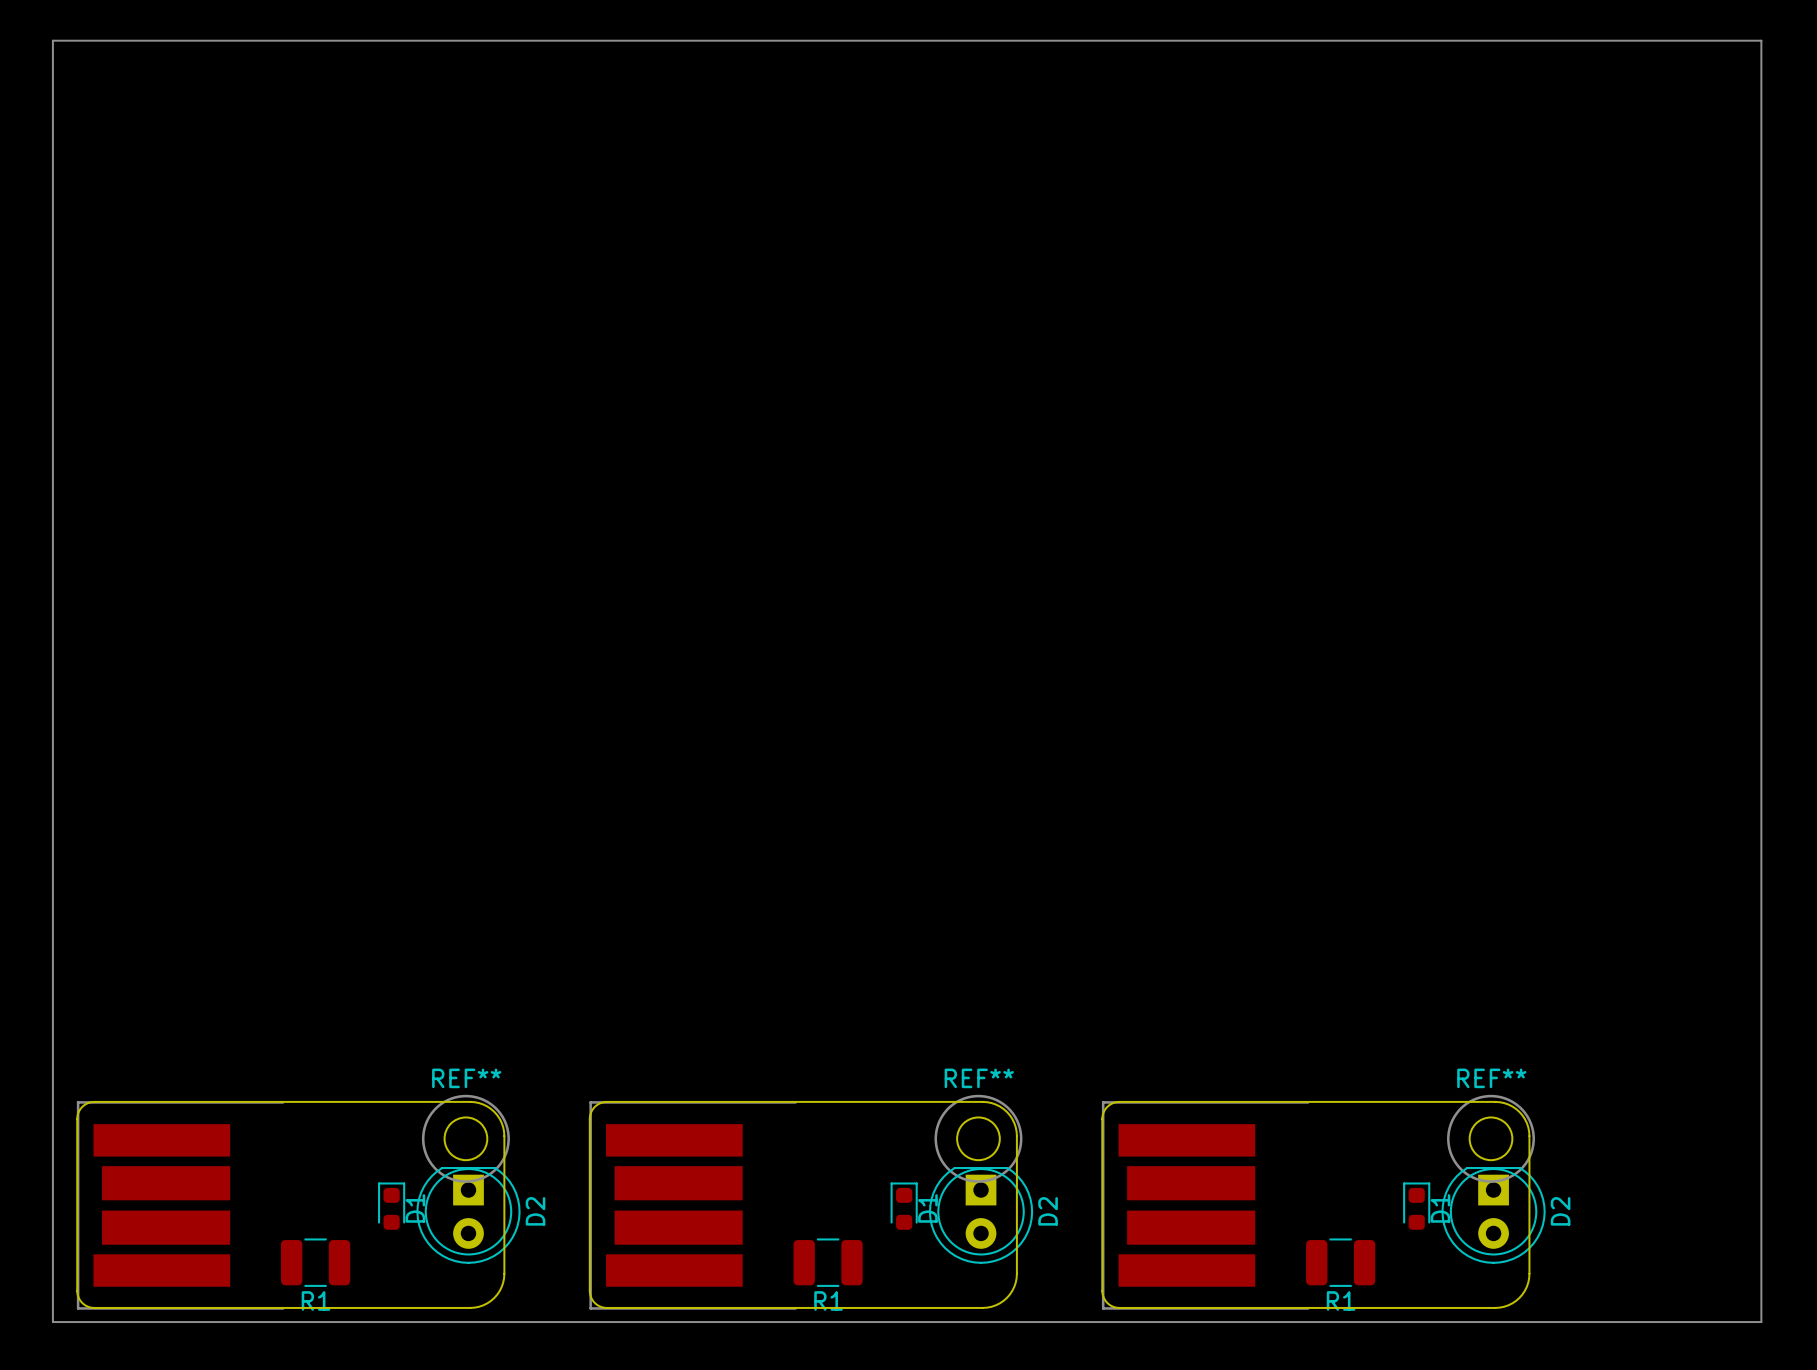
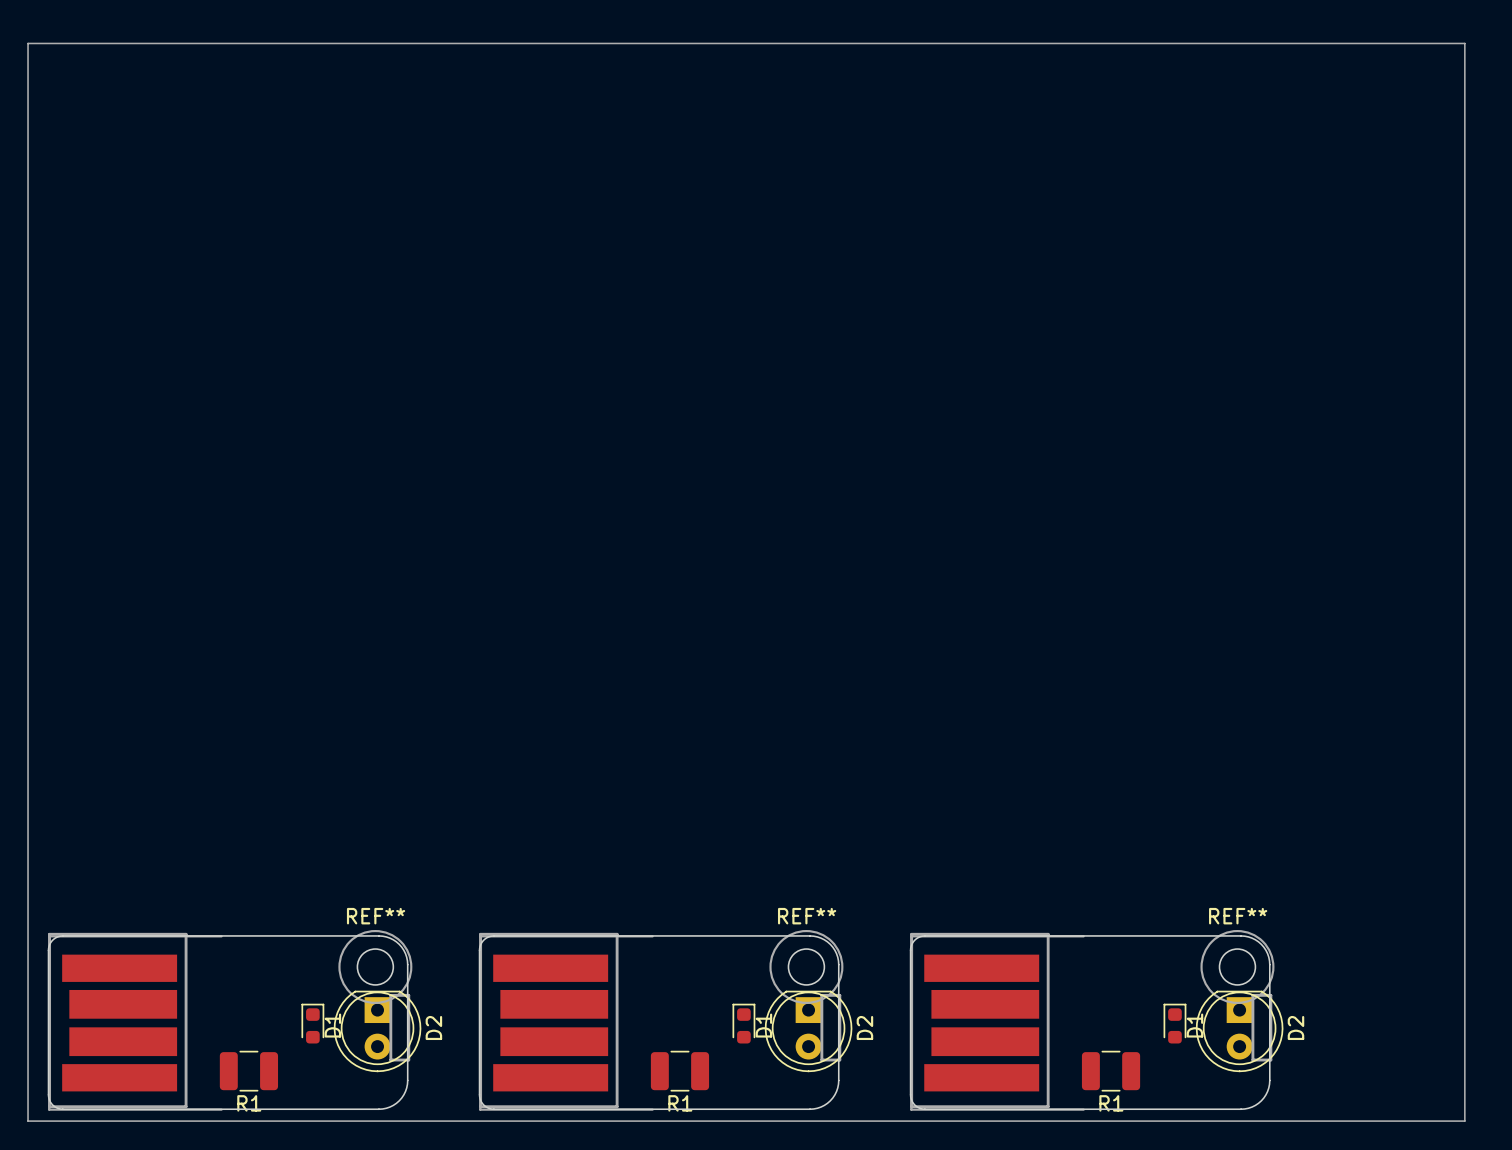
line: none -> (49, 934) (186, 934) (186, 1106) (49, 1106) (49, 934)
line: none -> (480, 934) (480, 1106) (617, 1106) (617, 934) (480, 934)
line: none -> (911, 934) (911, 1106) (1048, 1106) (1048, 934) (911, 934)
line: none -> (390, 995) (408, 995) (408, 1060) (390, 1060) (390, 995)
line: none -> (821, 995) (821, 1060) (839, 1060) (839, 995) (821, 995)
line: none -> (1252, 995) (1252, 1060) (1270, 1060) (1270, 995) (1252, 995)

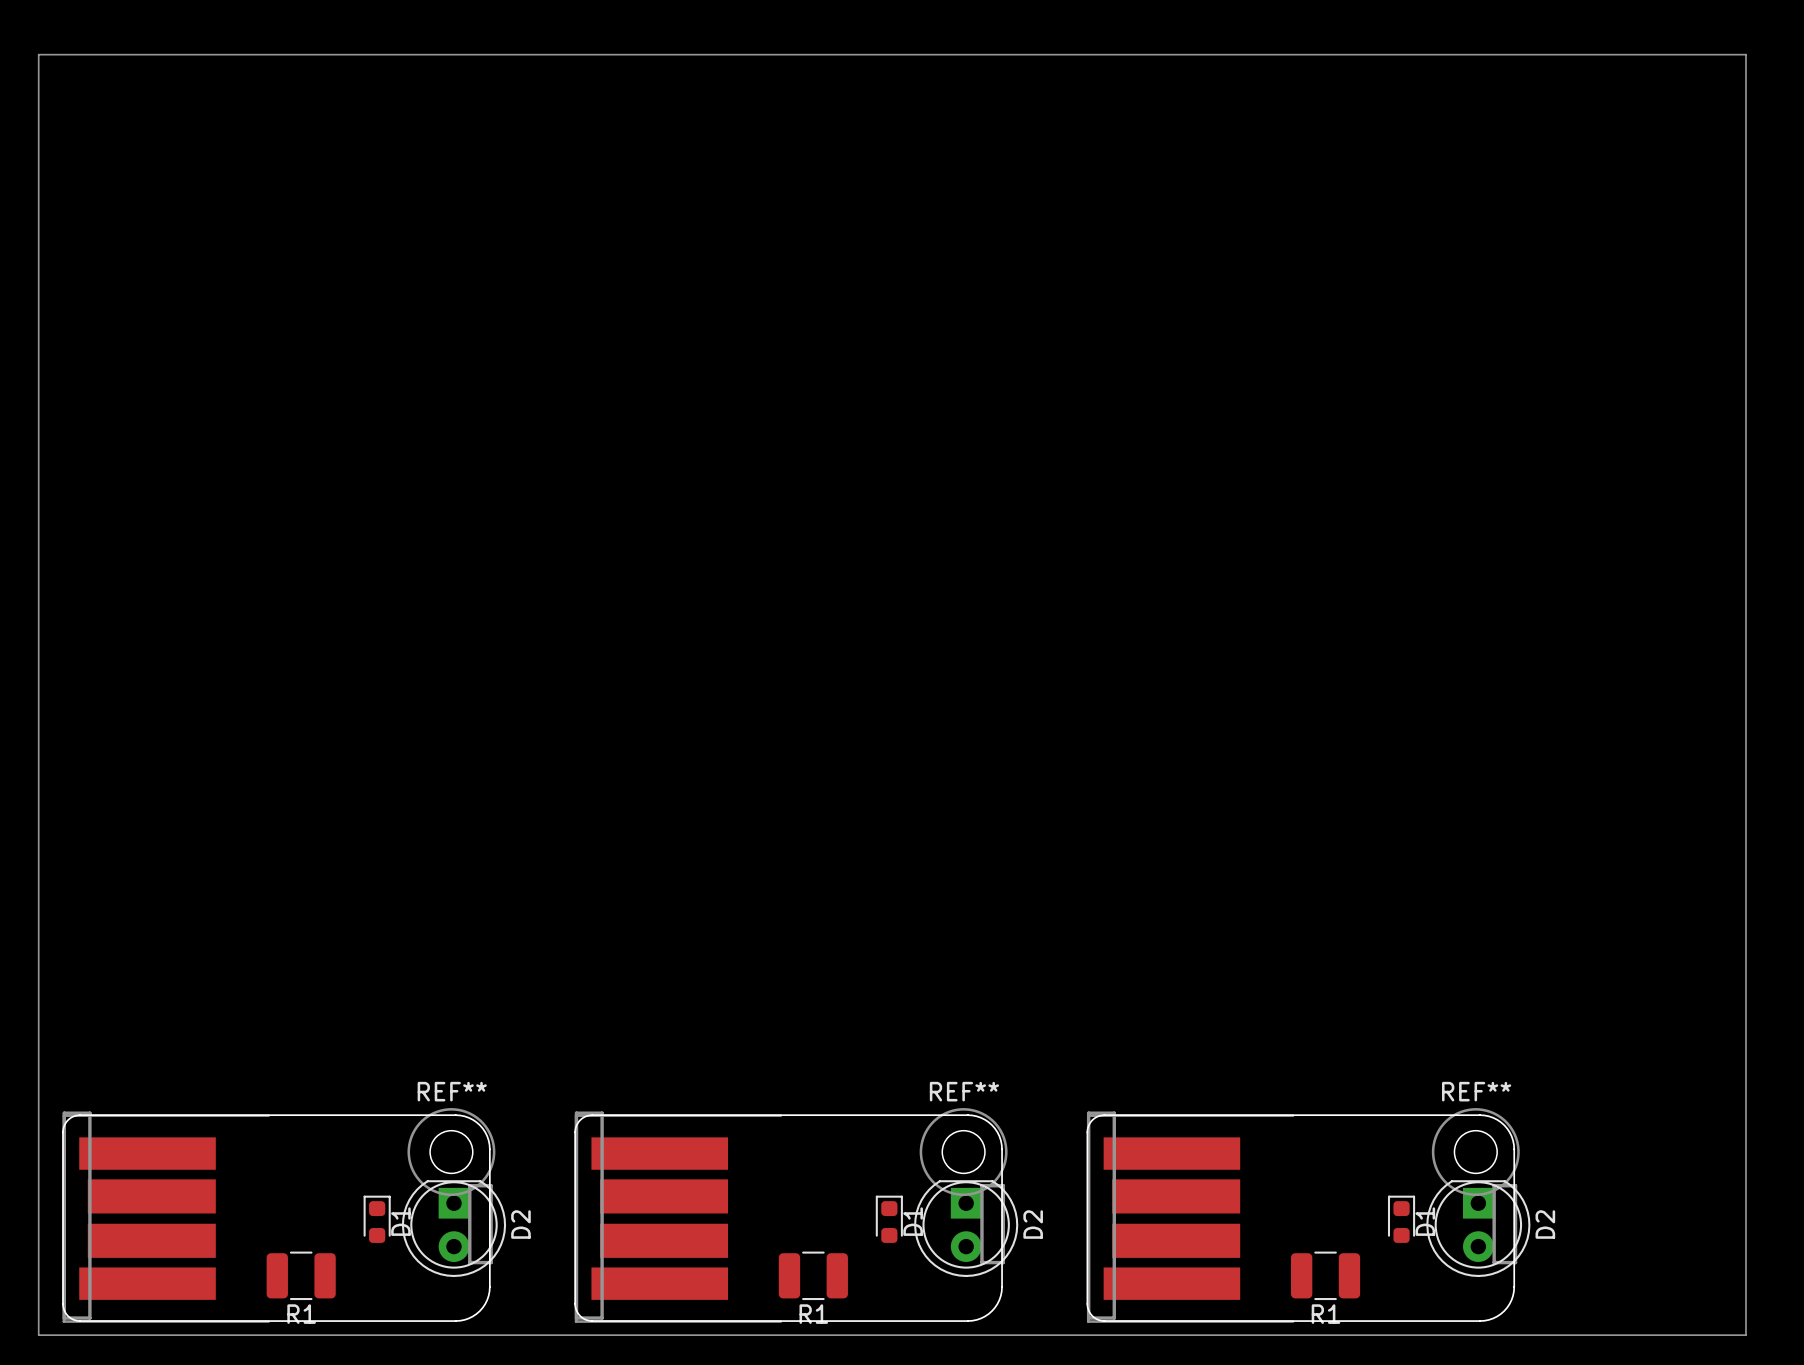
line: (71, 934) (186, 934) (186, 1106) (71, 1106) -> (89, 1113) (89, 1318)
line: (502, 934) (617, 934) (617, 1106) (502, 1106) -> (602, 1113) (602, 1318)
line: (933, 934) (1048, 934) (1048, 1106) (933, 1106) -> (1114, 1113) (1114, 1318)

